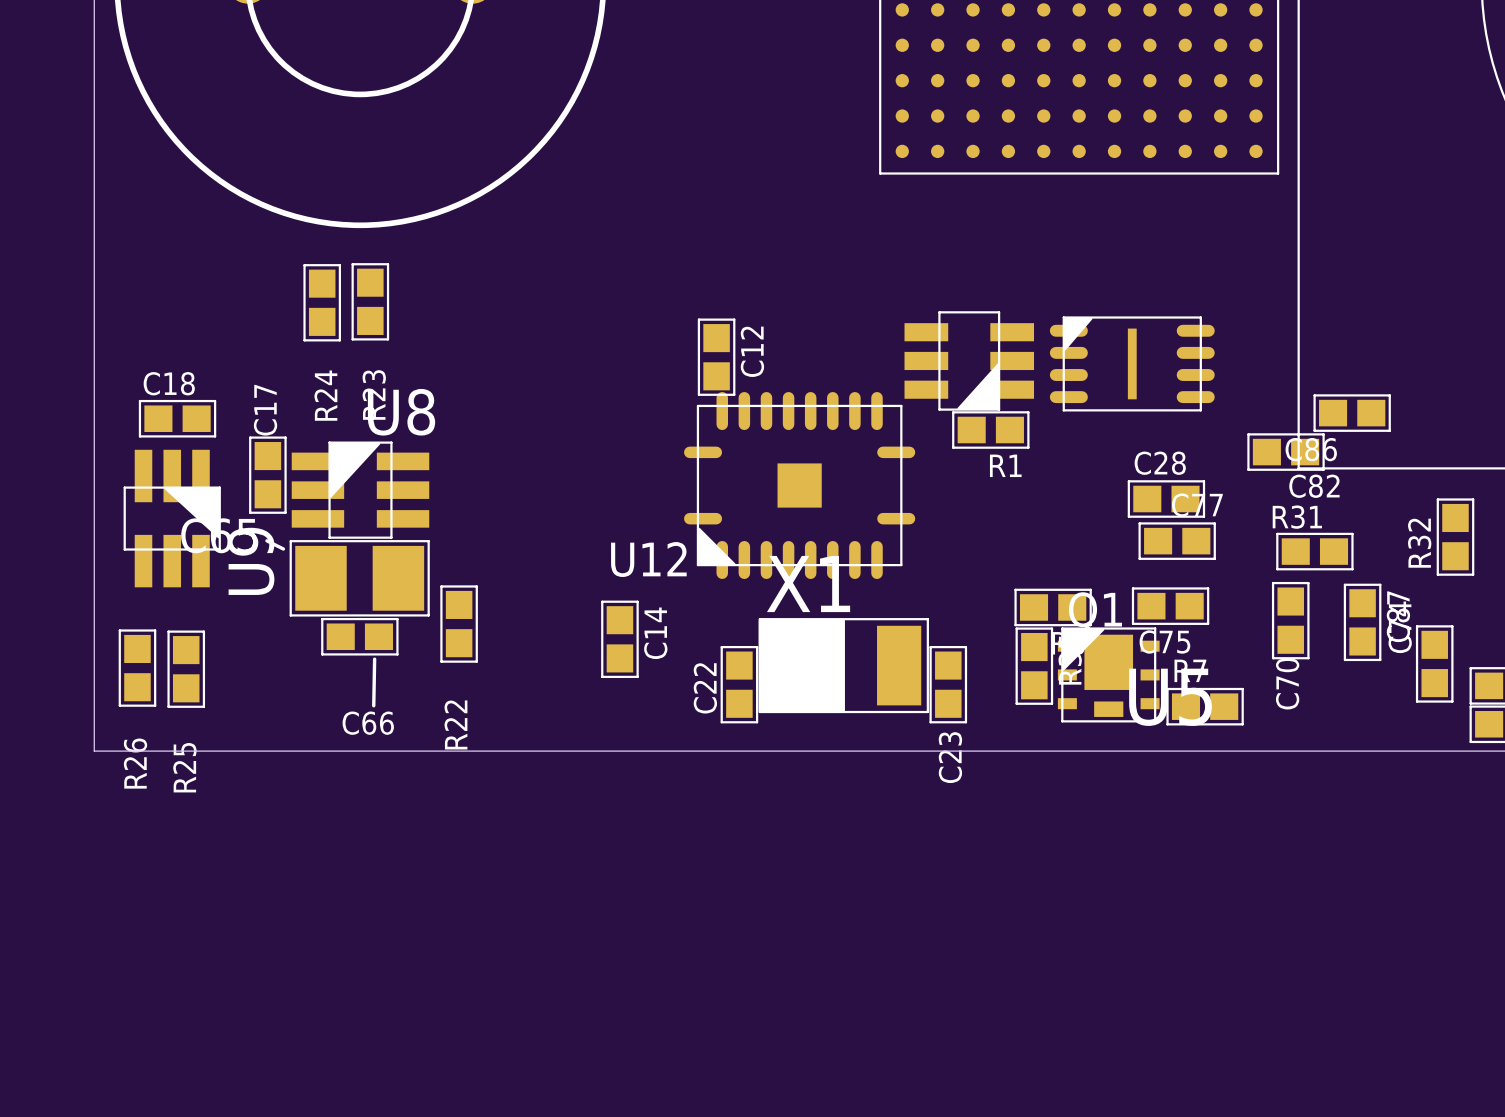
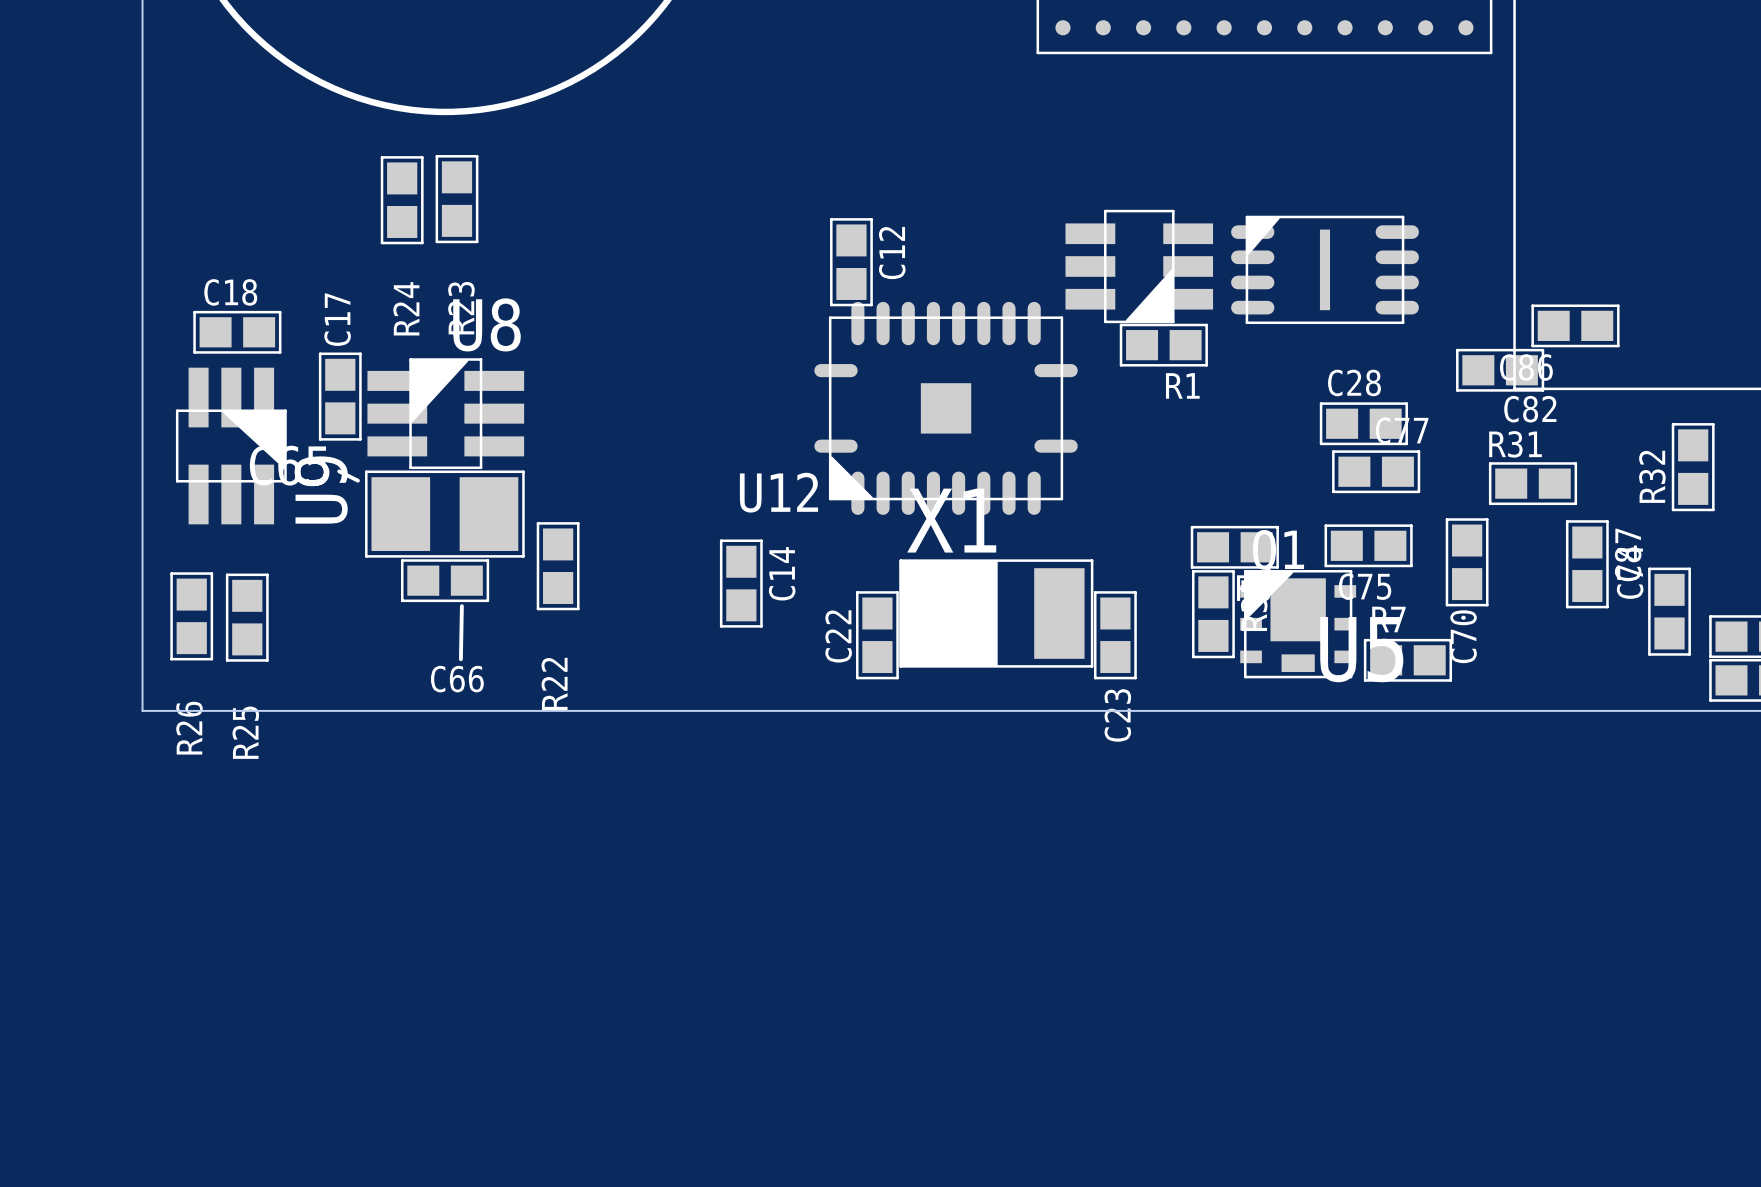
C70 position: (1290, 620) -> (1467, 562)

